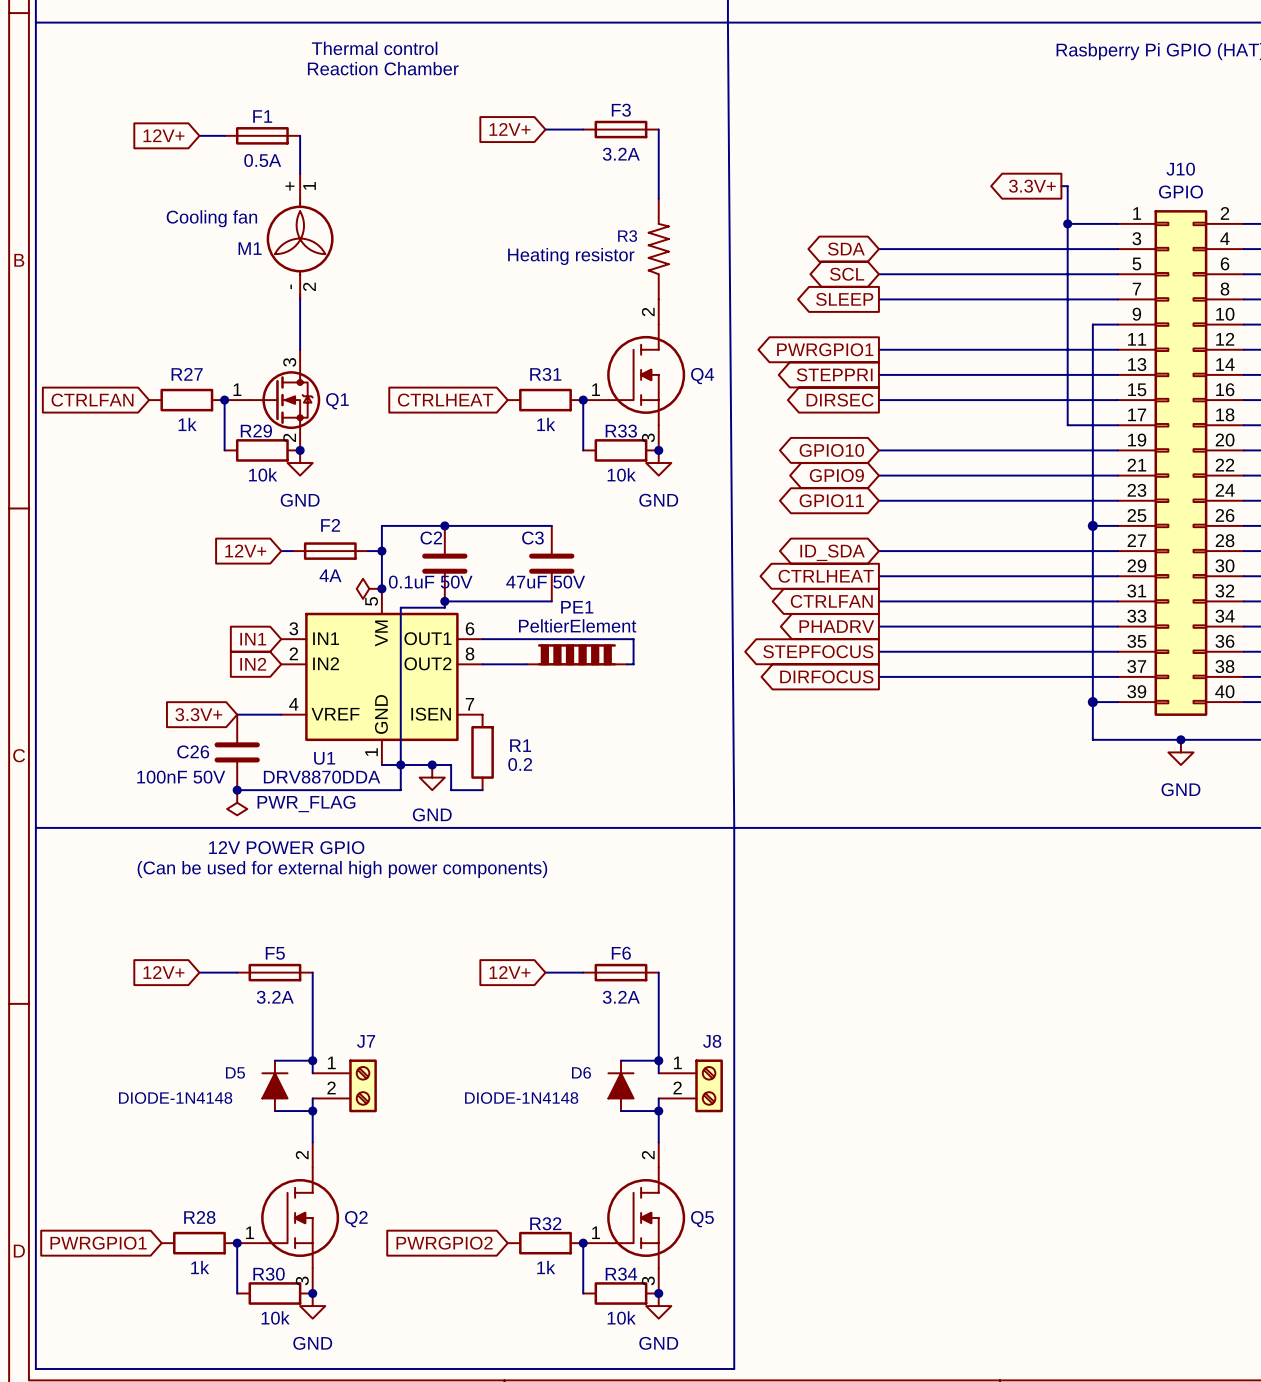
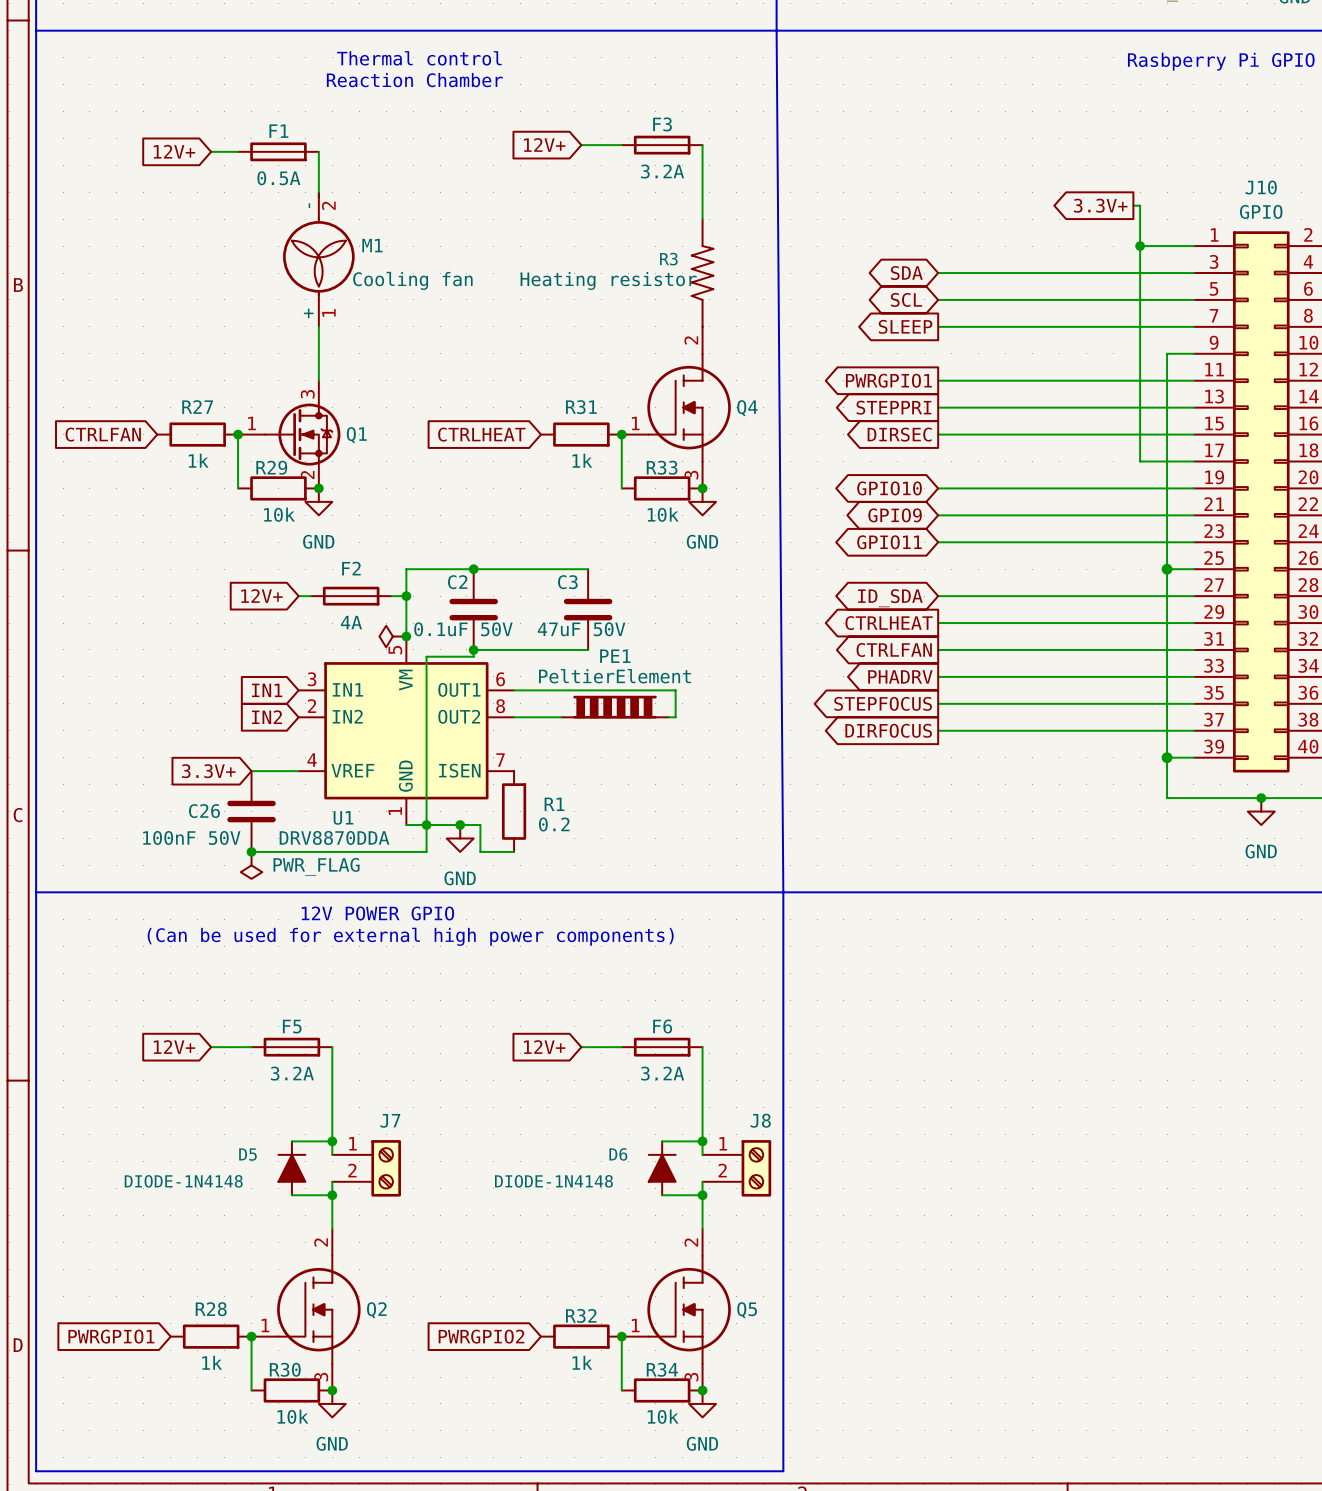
M1 rotation: 0° (300, 249) -> 180° (318, 246)

